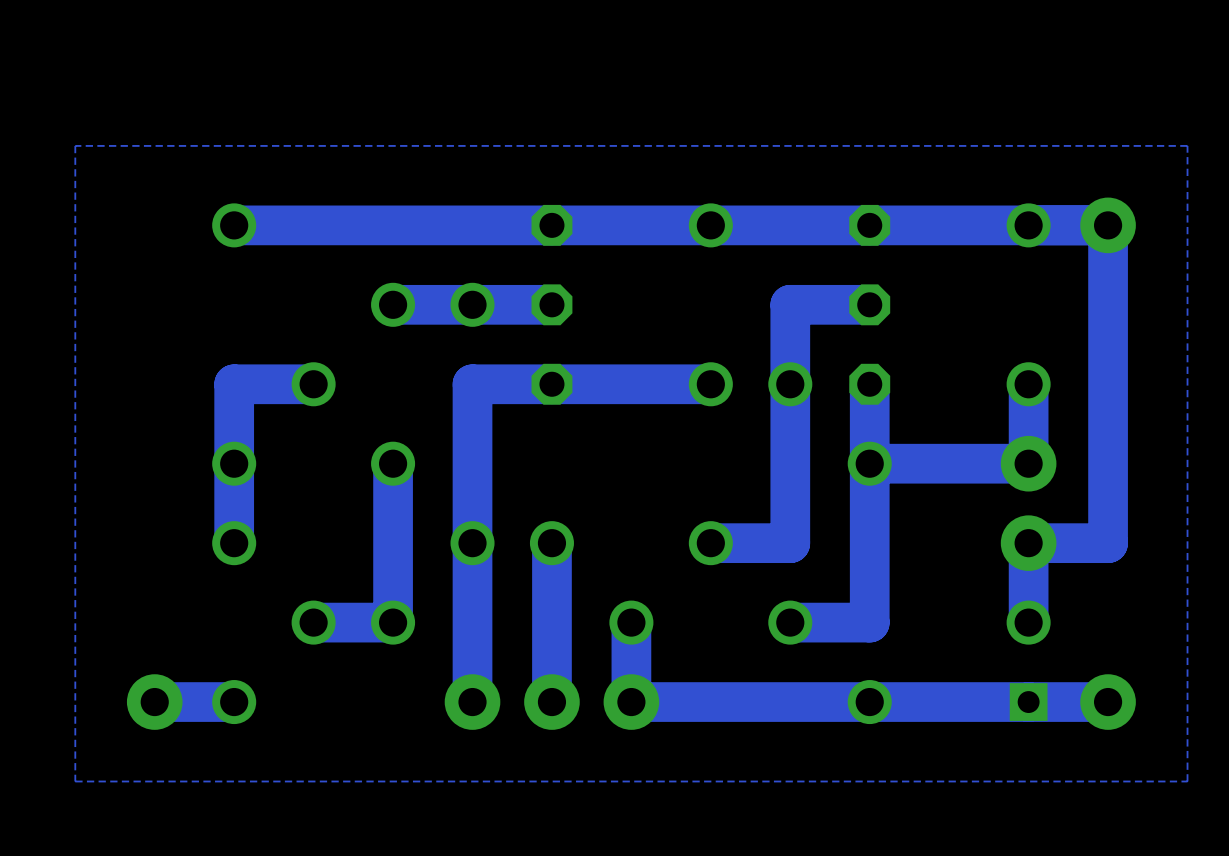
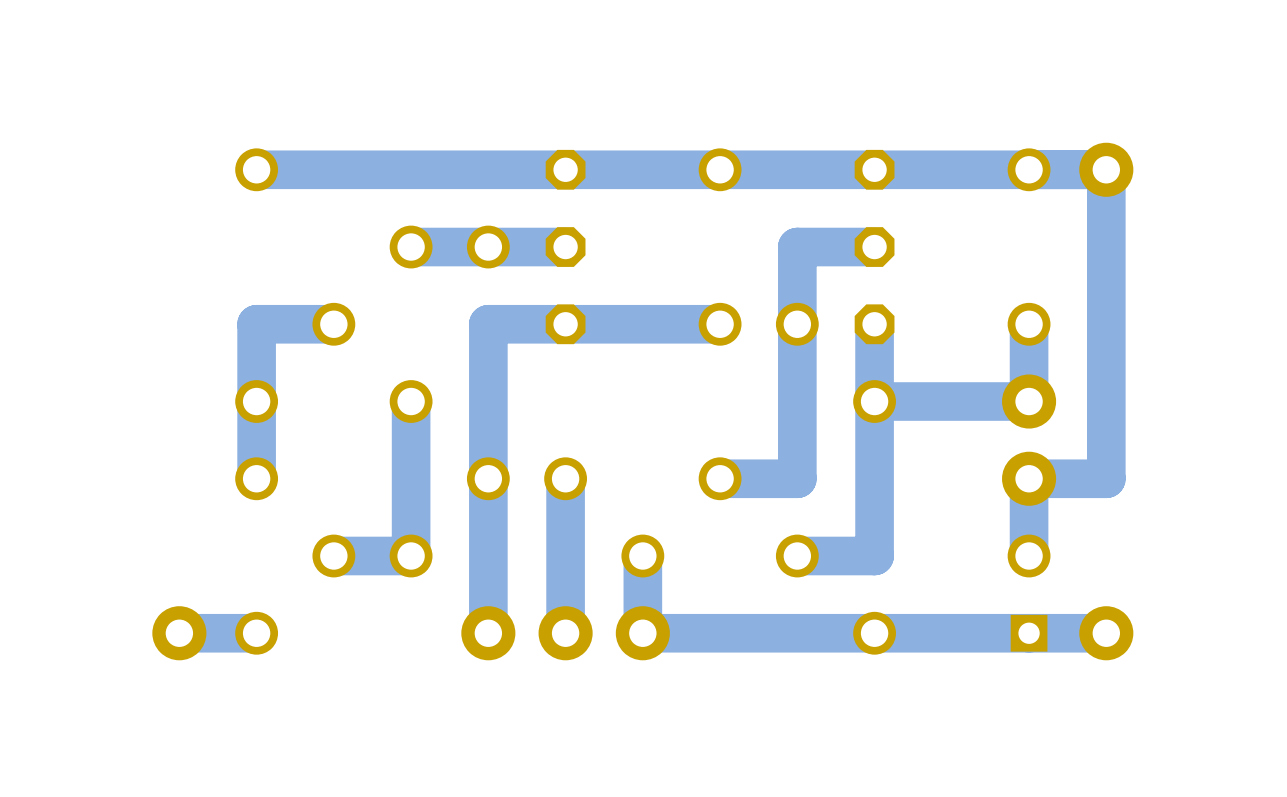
bottom zone outline: (1187, 145) (75, 145) (75, 781) (1187, 781) (1187, 145) -> none

